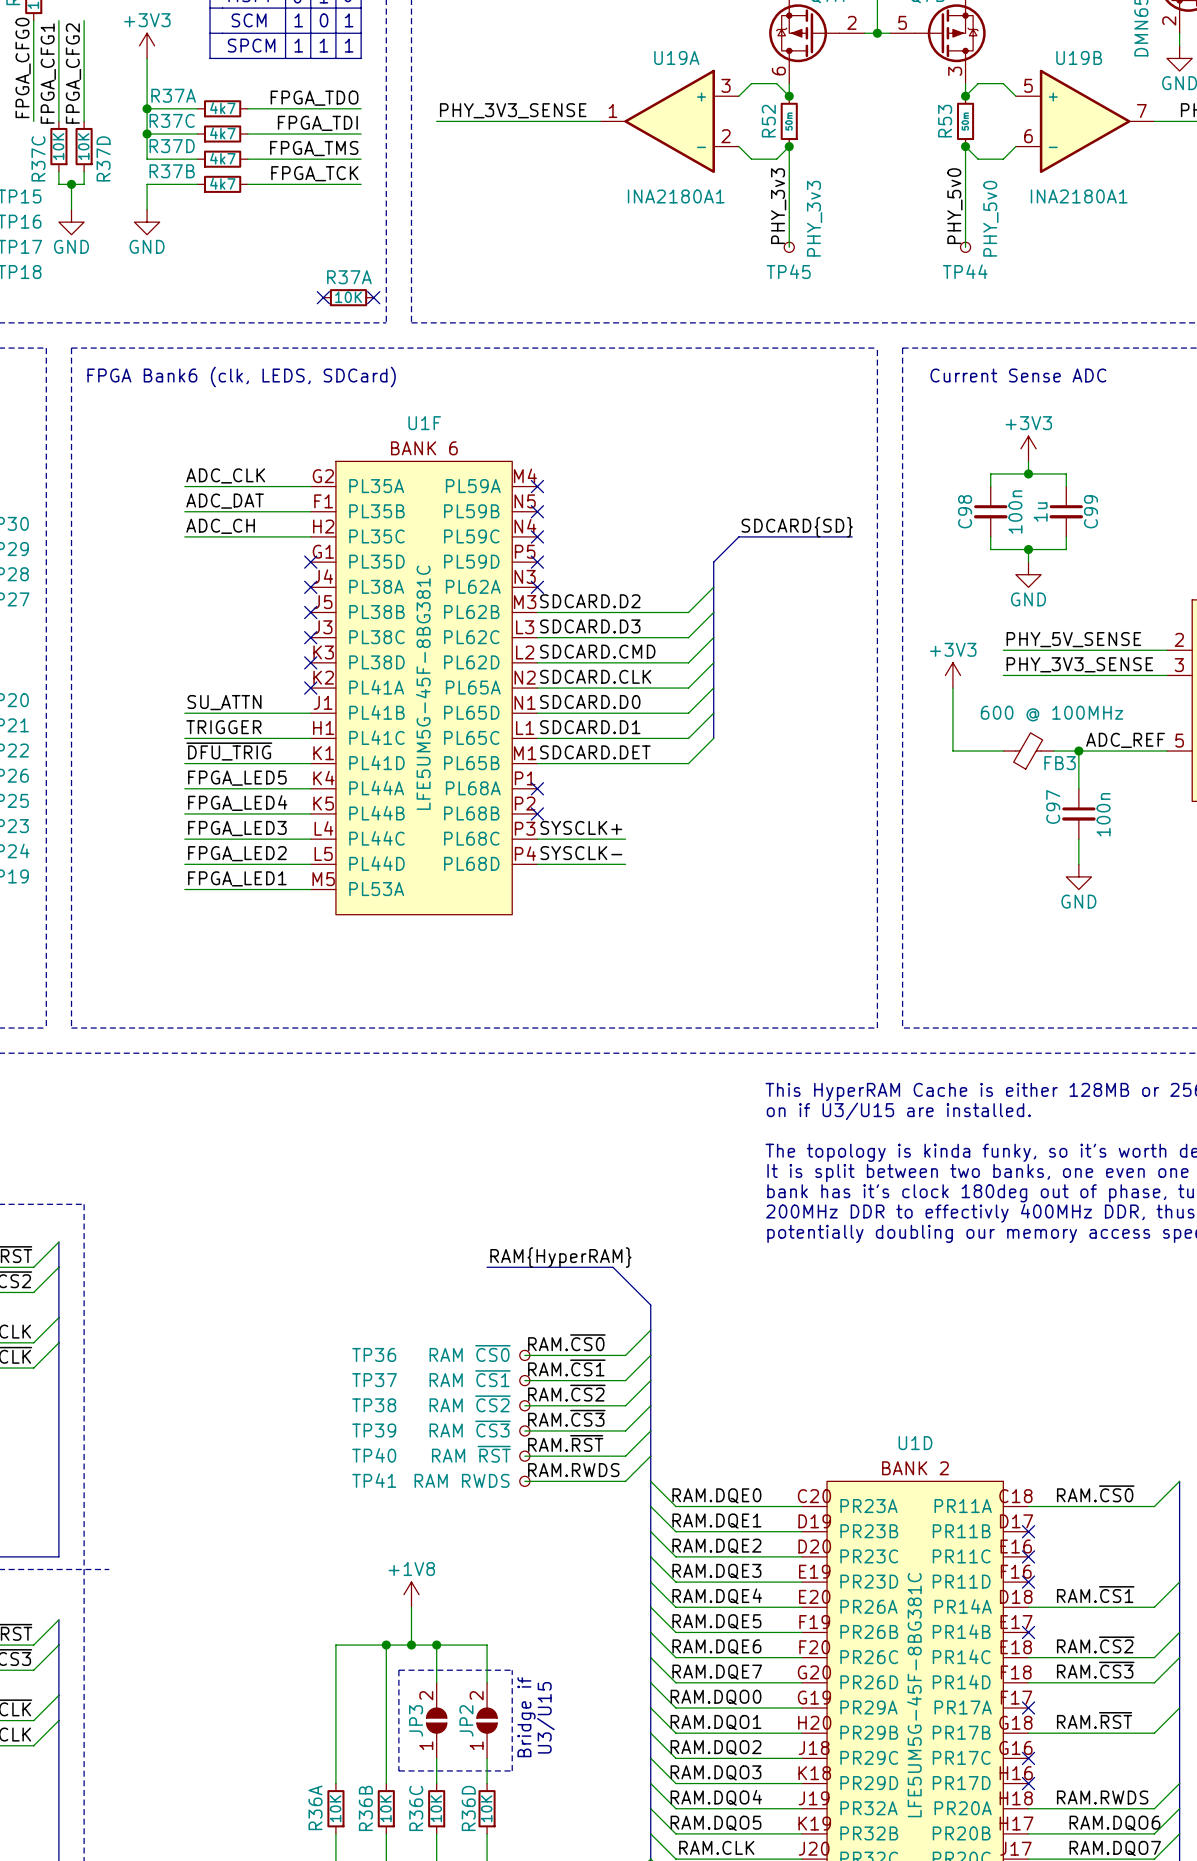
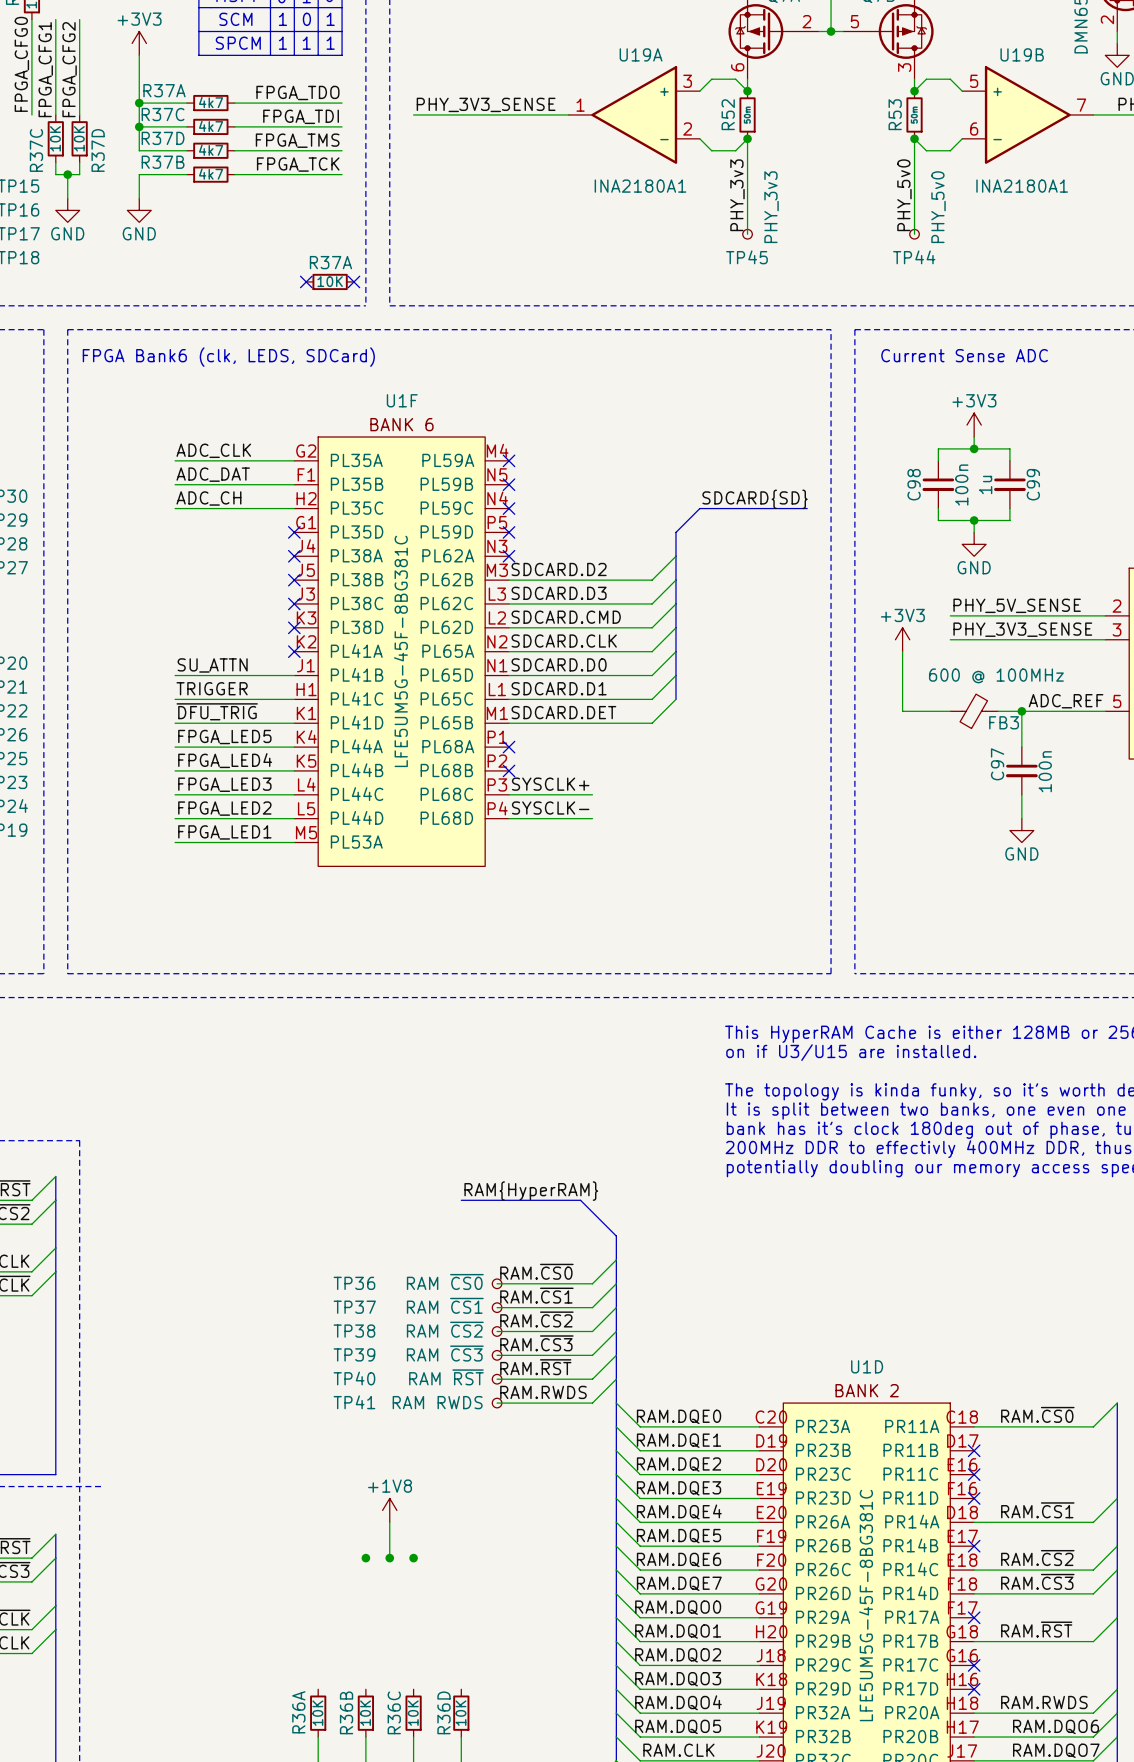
wire: (386, 1645) (386, 1783) -> none
wire: (436, 1645) (436, 1682) -> none
line: (398, 1670) (512, 1670) (512, 1770) (398, 1770) (398, 1670) -> none
wire: (487, 1682) (487, 1645) (335, 1645) (335, 1783) -> none
text: Bridge if (526, 1717) -> none
text: U3/U15 (545, 1717) -> none
JP3: (436, 1720) -> none
JP2: (487, 1720) -> none
wire: (436, 1758) (436, 1783) -> none
wire: (487, 1758) (487, 1783) -> none

